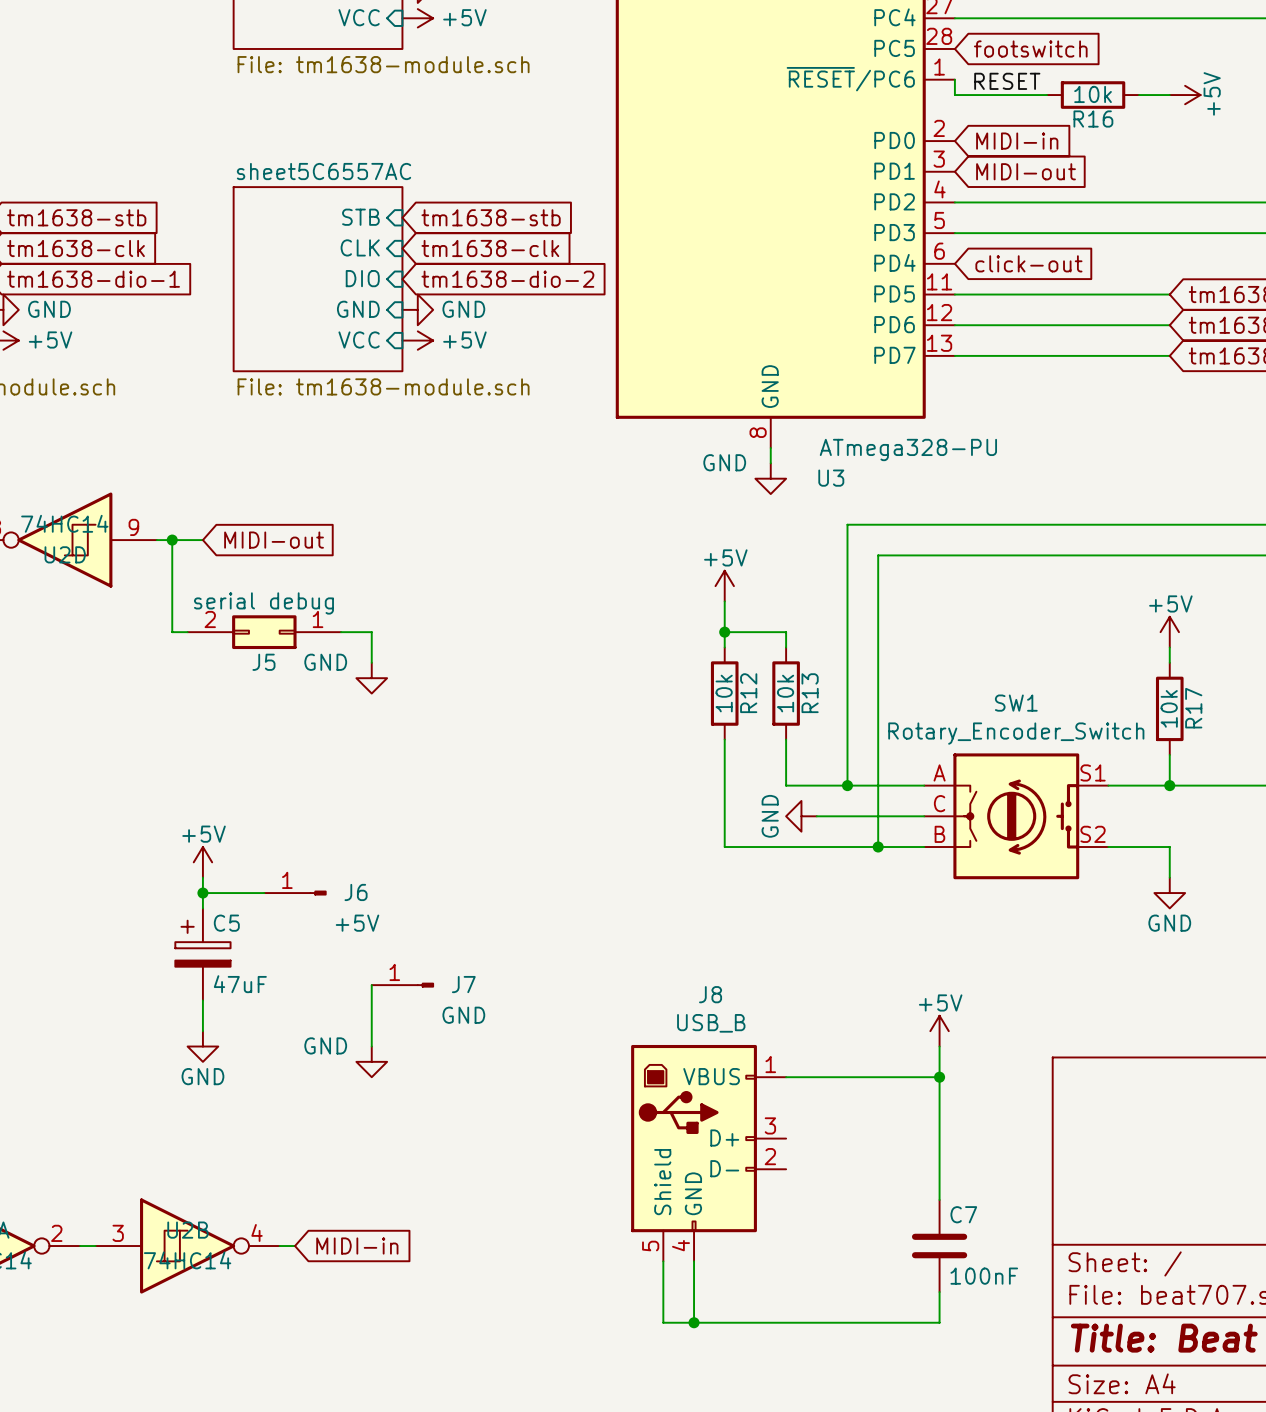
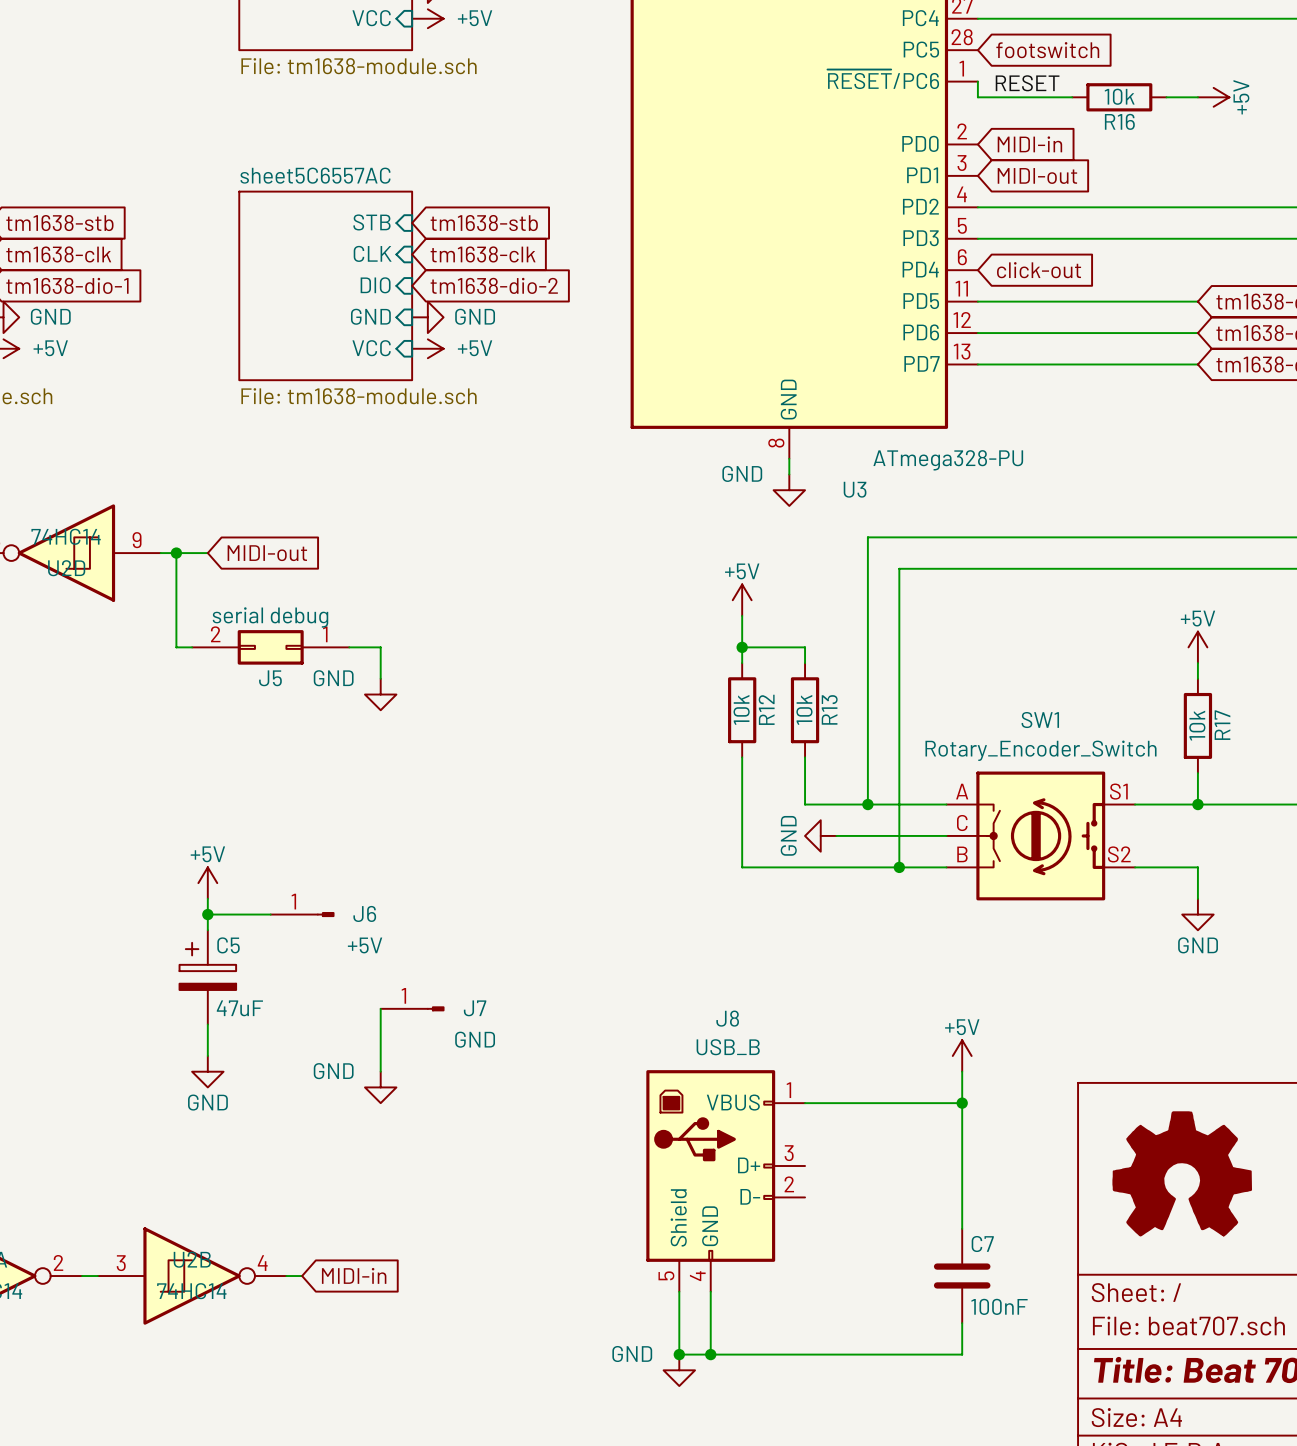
part: none -> (1182, 1173)
junction: none -> (679, 1354)
power symbol: none -> GND (679, 1370)

